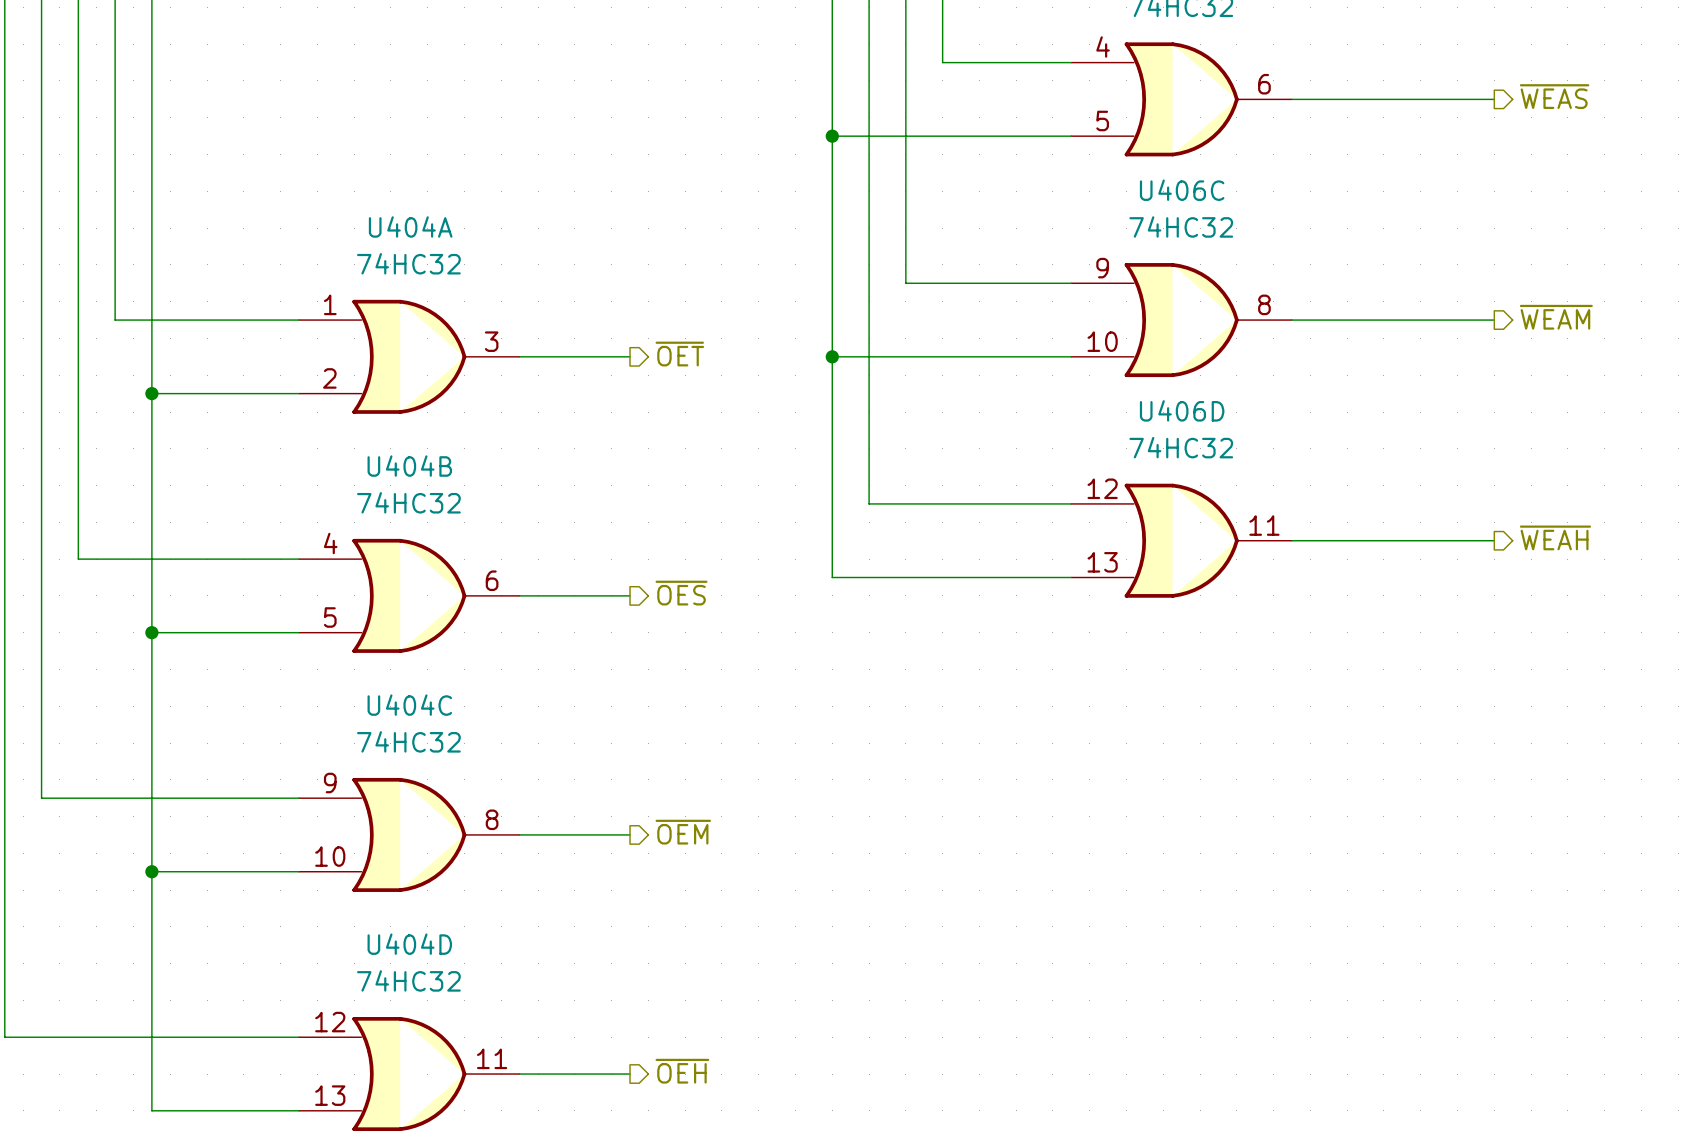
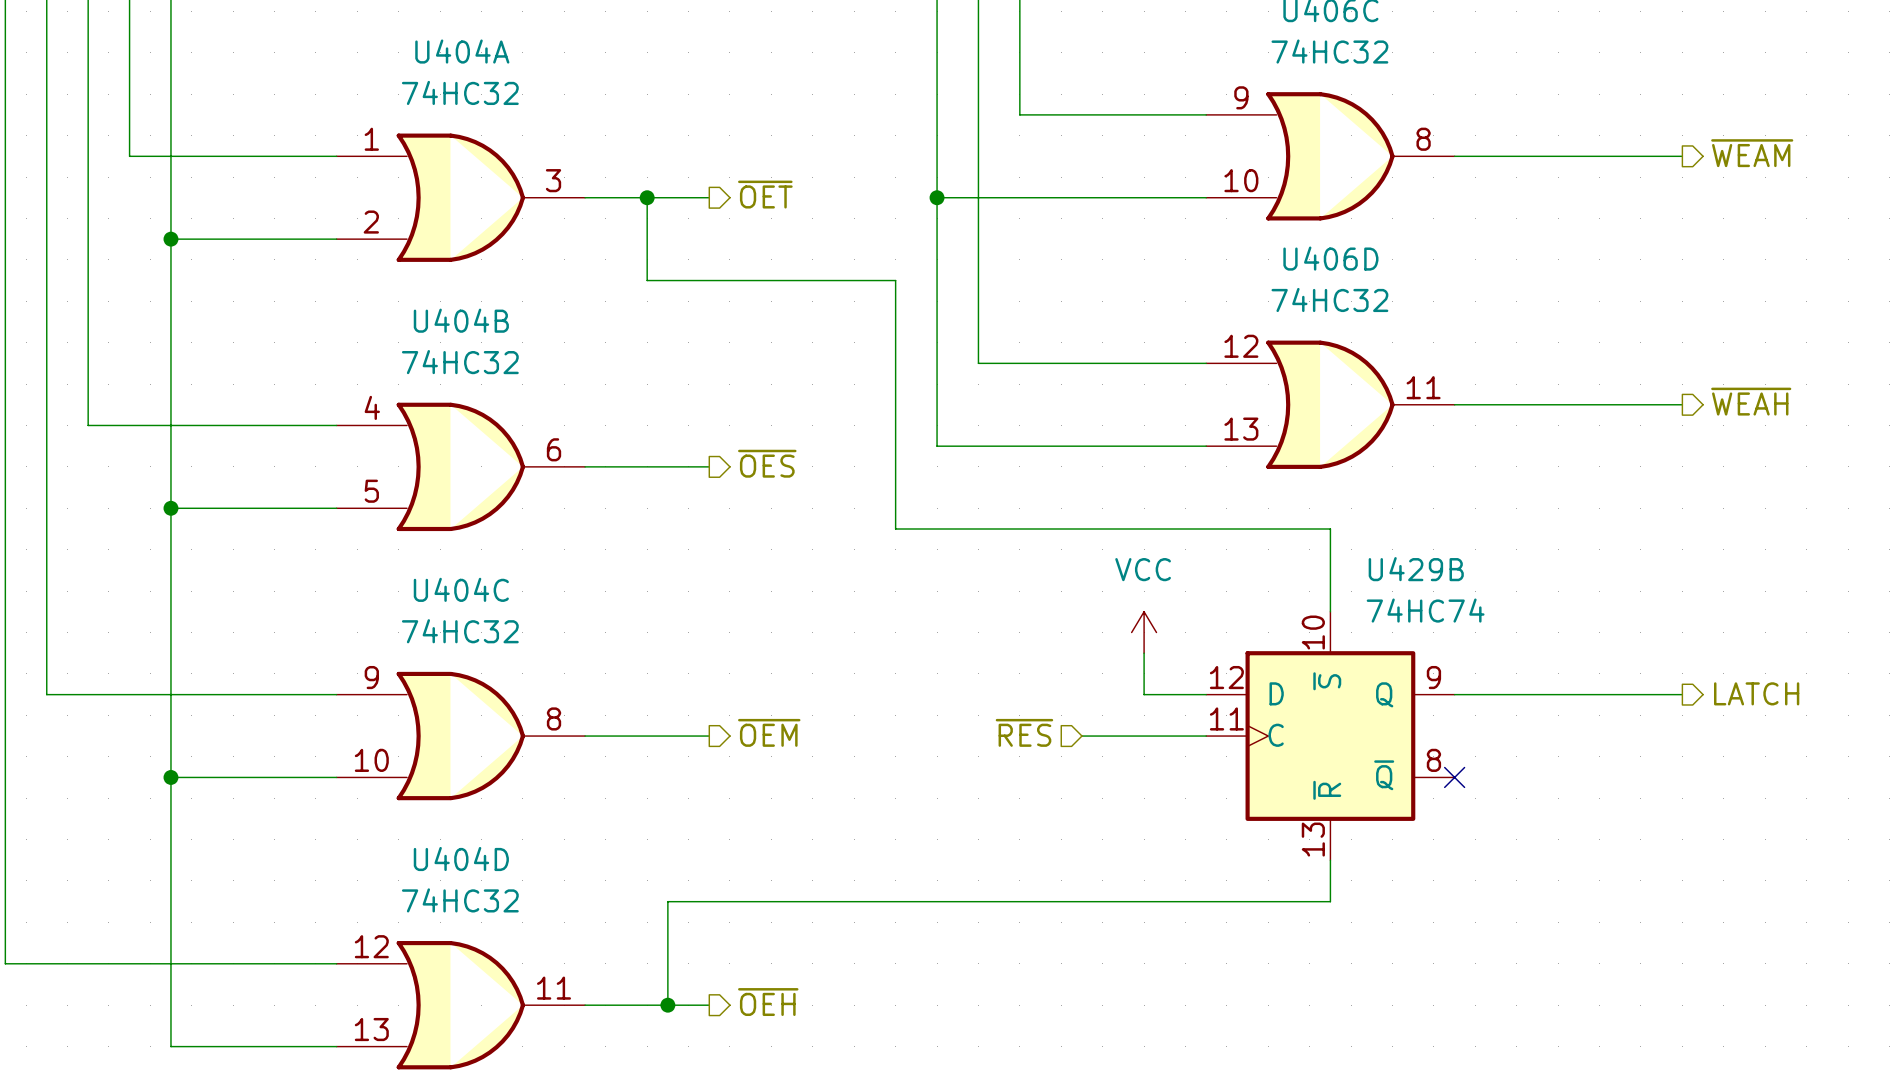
wire: none -> (647, 197) (647, 280) (895, 280) (895, 528) (1330, 528) (1330, 611)
junction: none -> (647, 197)
power symbol: none -> VCC (1144, 632)
wire: none -> (1144, 653) (1144, 694) (1206, 694)
hierarchical label: none -> LATCH (1756, 693)
wire: none -> (1454, 694) (1682, 694)
hierarchical label: none -> ~{RES} (1024, 732)
wire: none -> (1081, 736) (1206, 736)
U429B: none -> 74HC74 (1330, 736)
no-connect mark: none -> (1454, 777)
wire: none -> (1330, 860) (1330, 901) (667, 901) (667, 1005)
junction: none -> (667, 1005)

